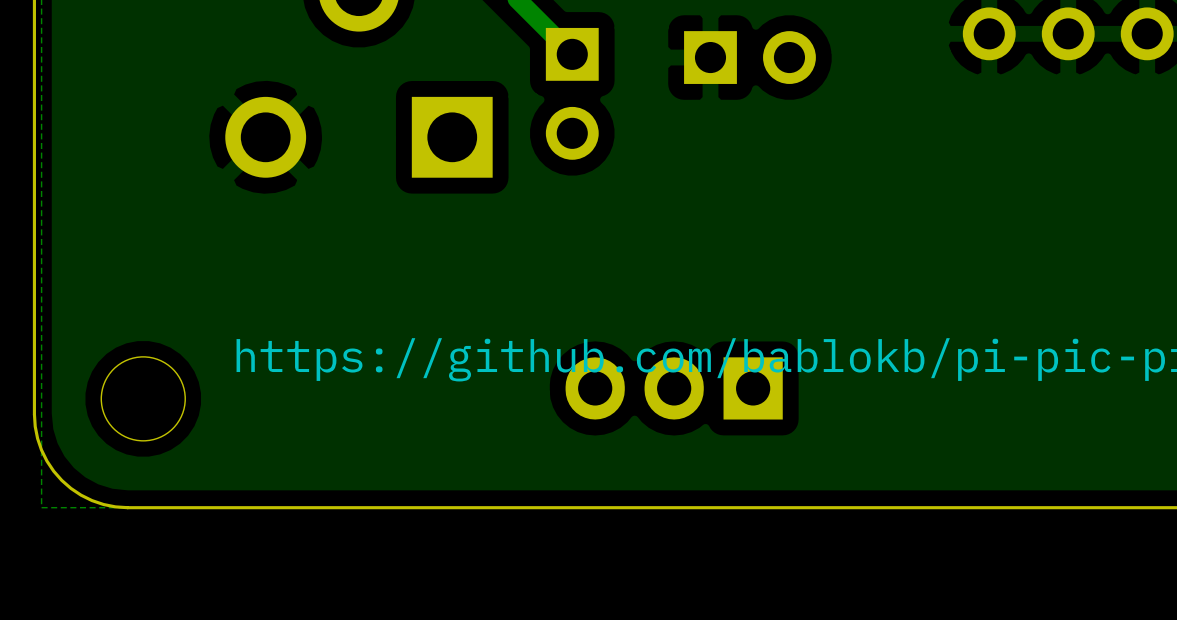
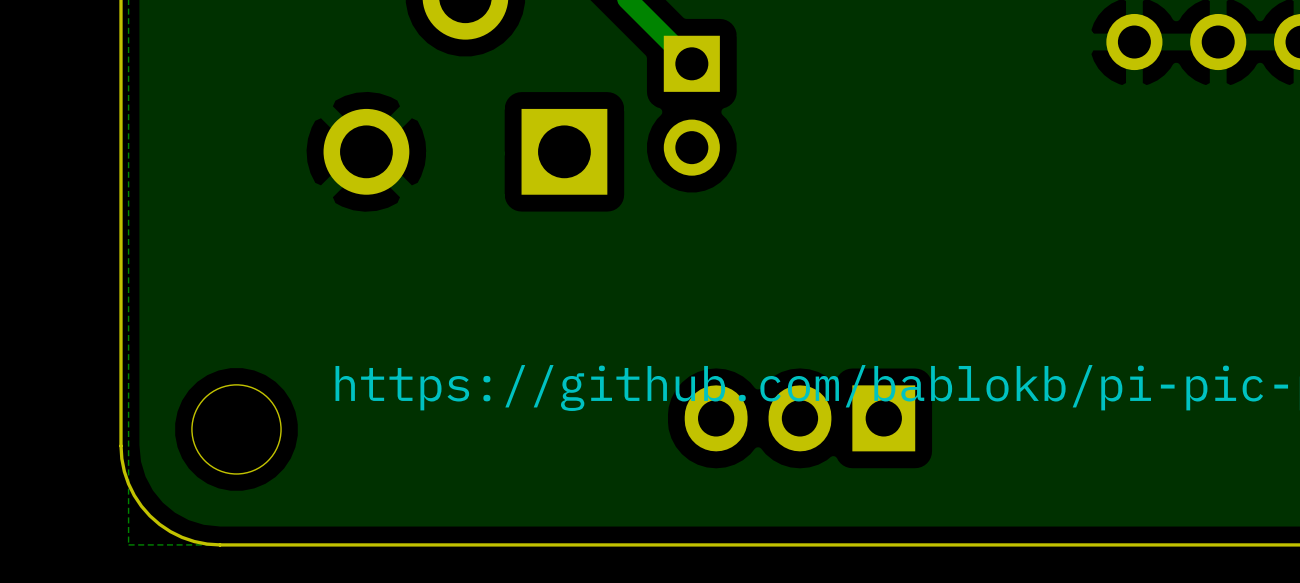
part: (749, 57) -> none

